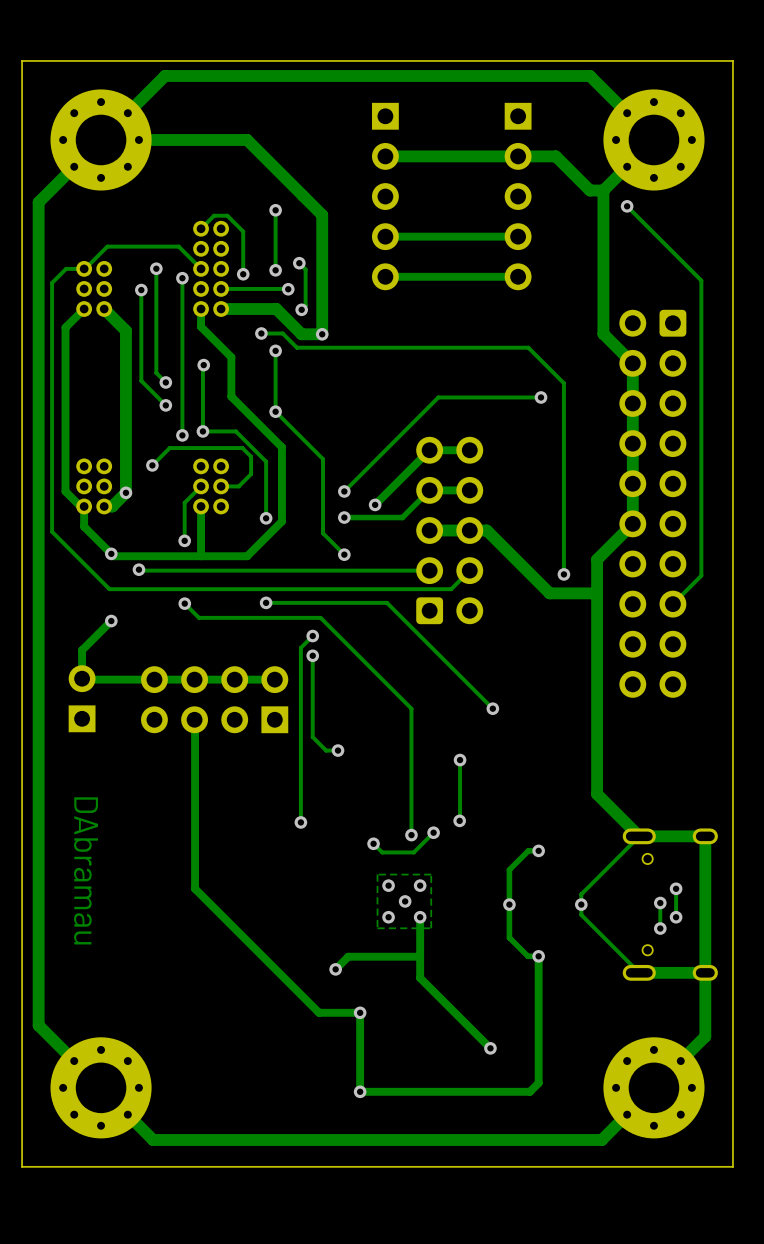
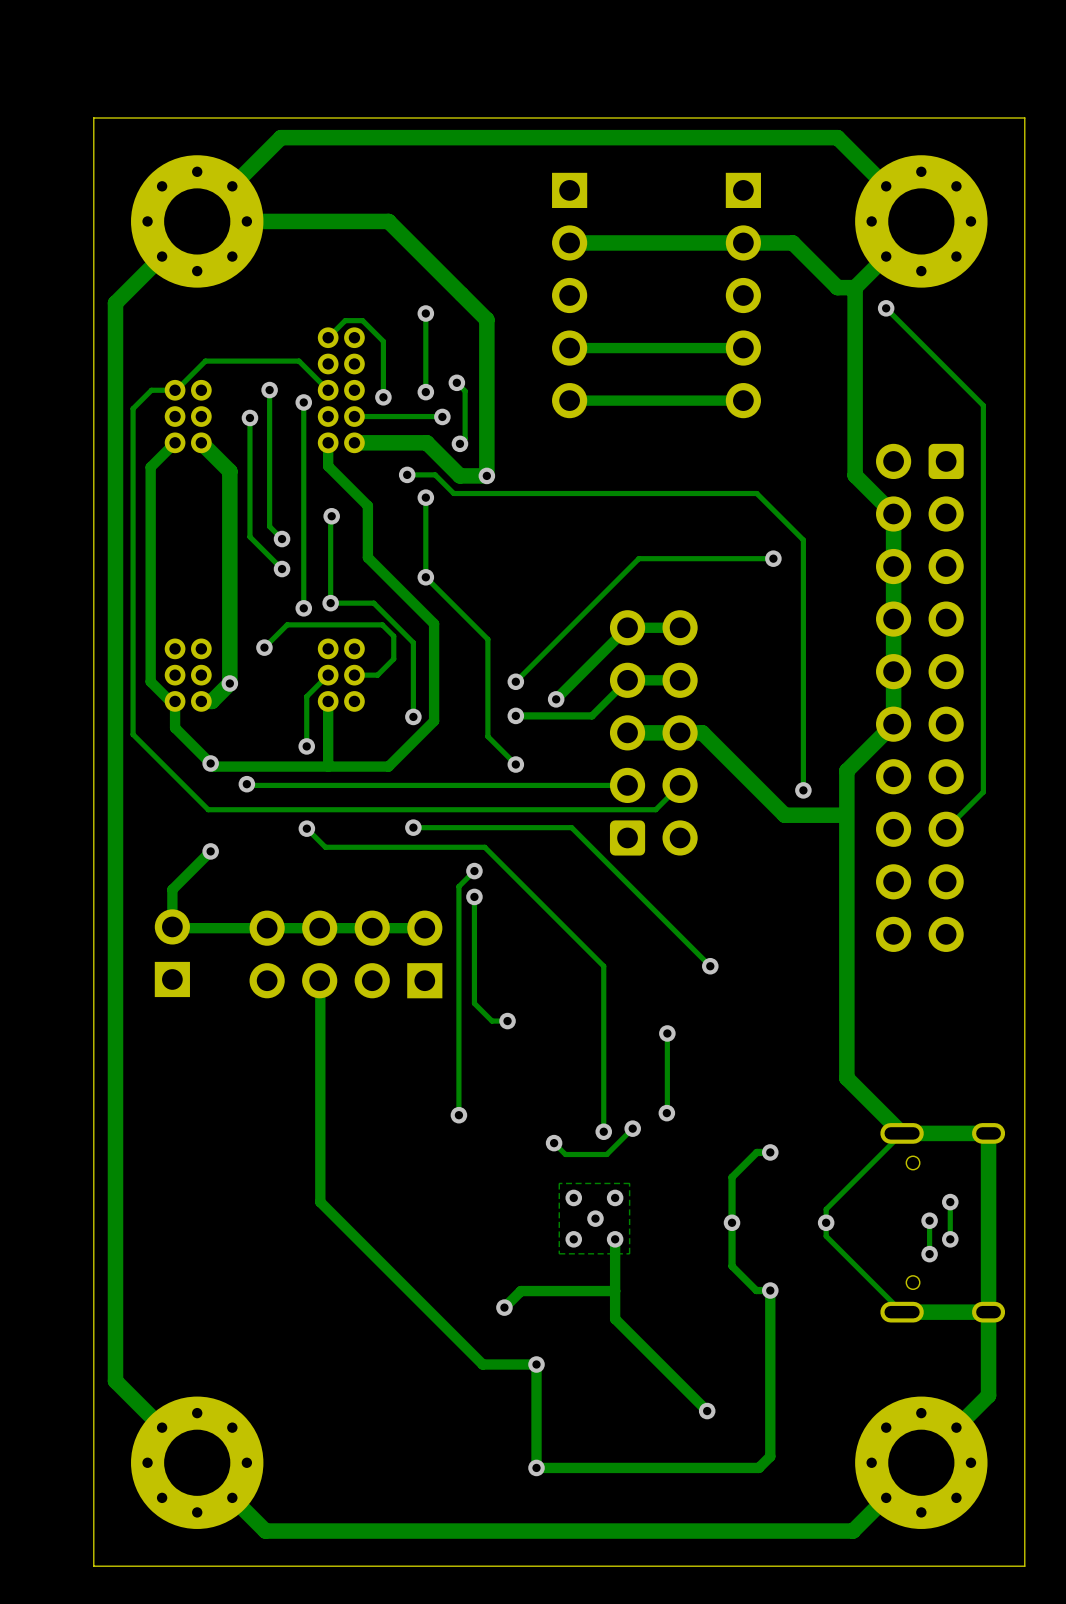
text: DAbramau (86, 870) -> none

